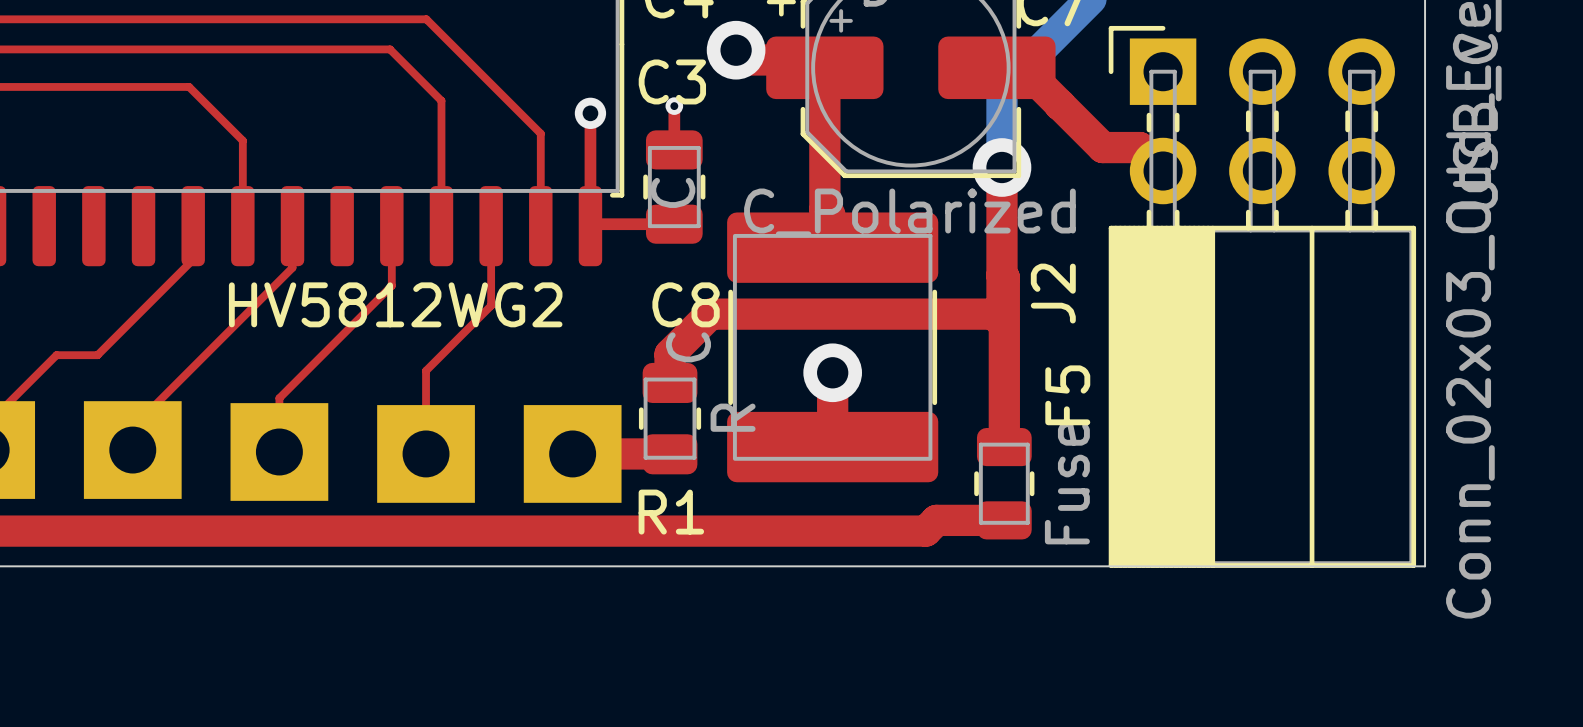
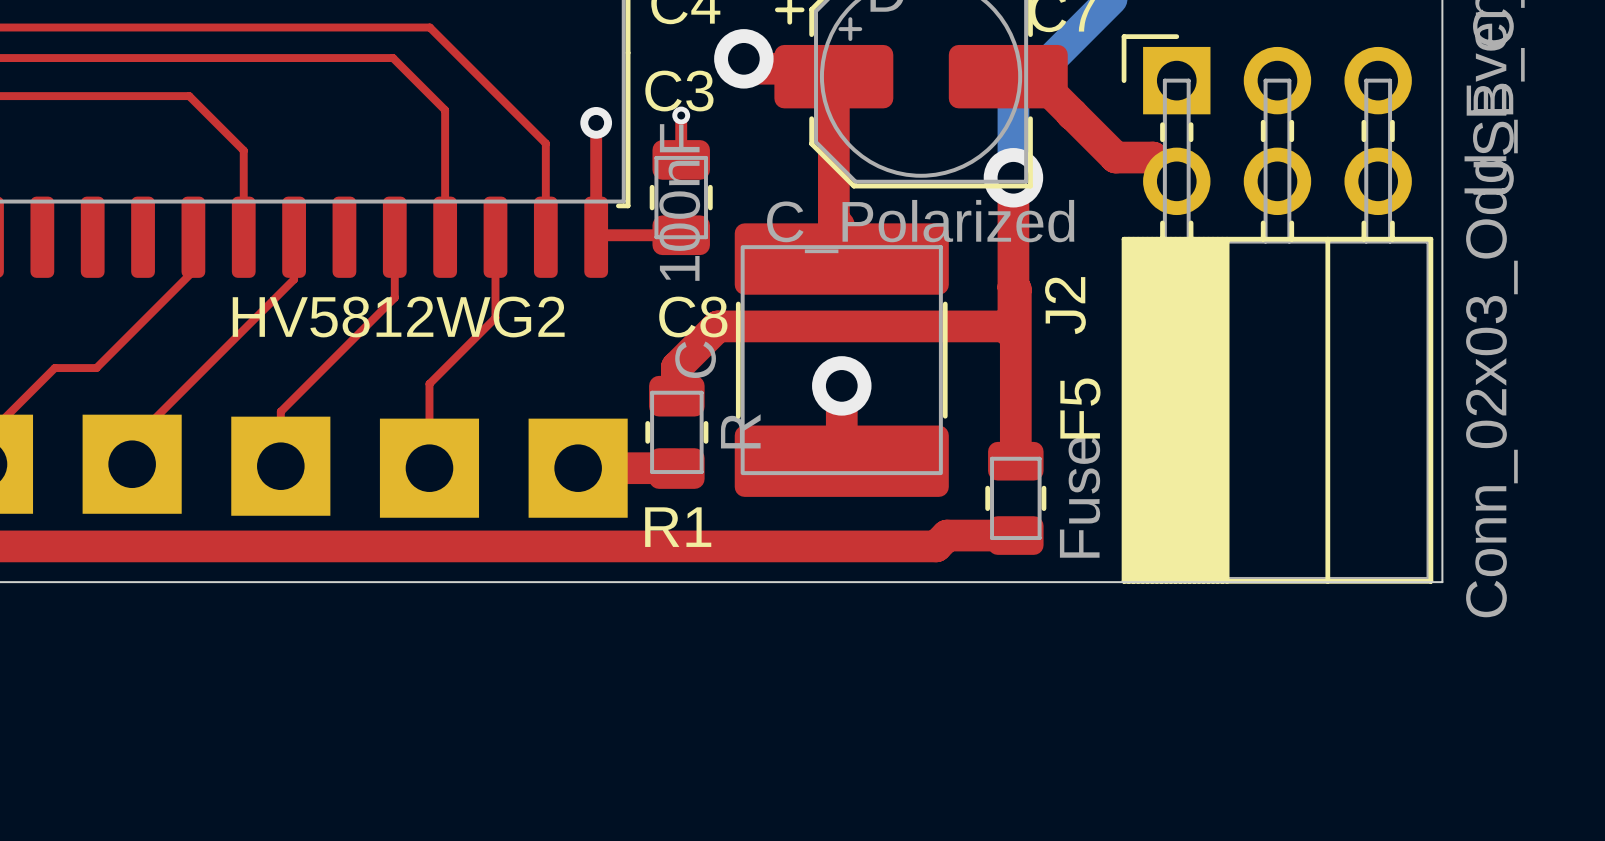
C3 value: C (672, 192) -> 100nF (679, 202)

